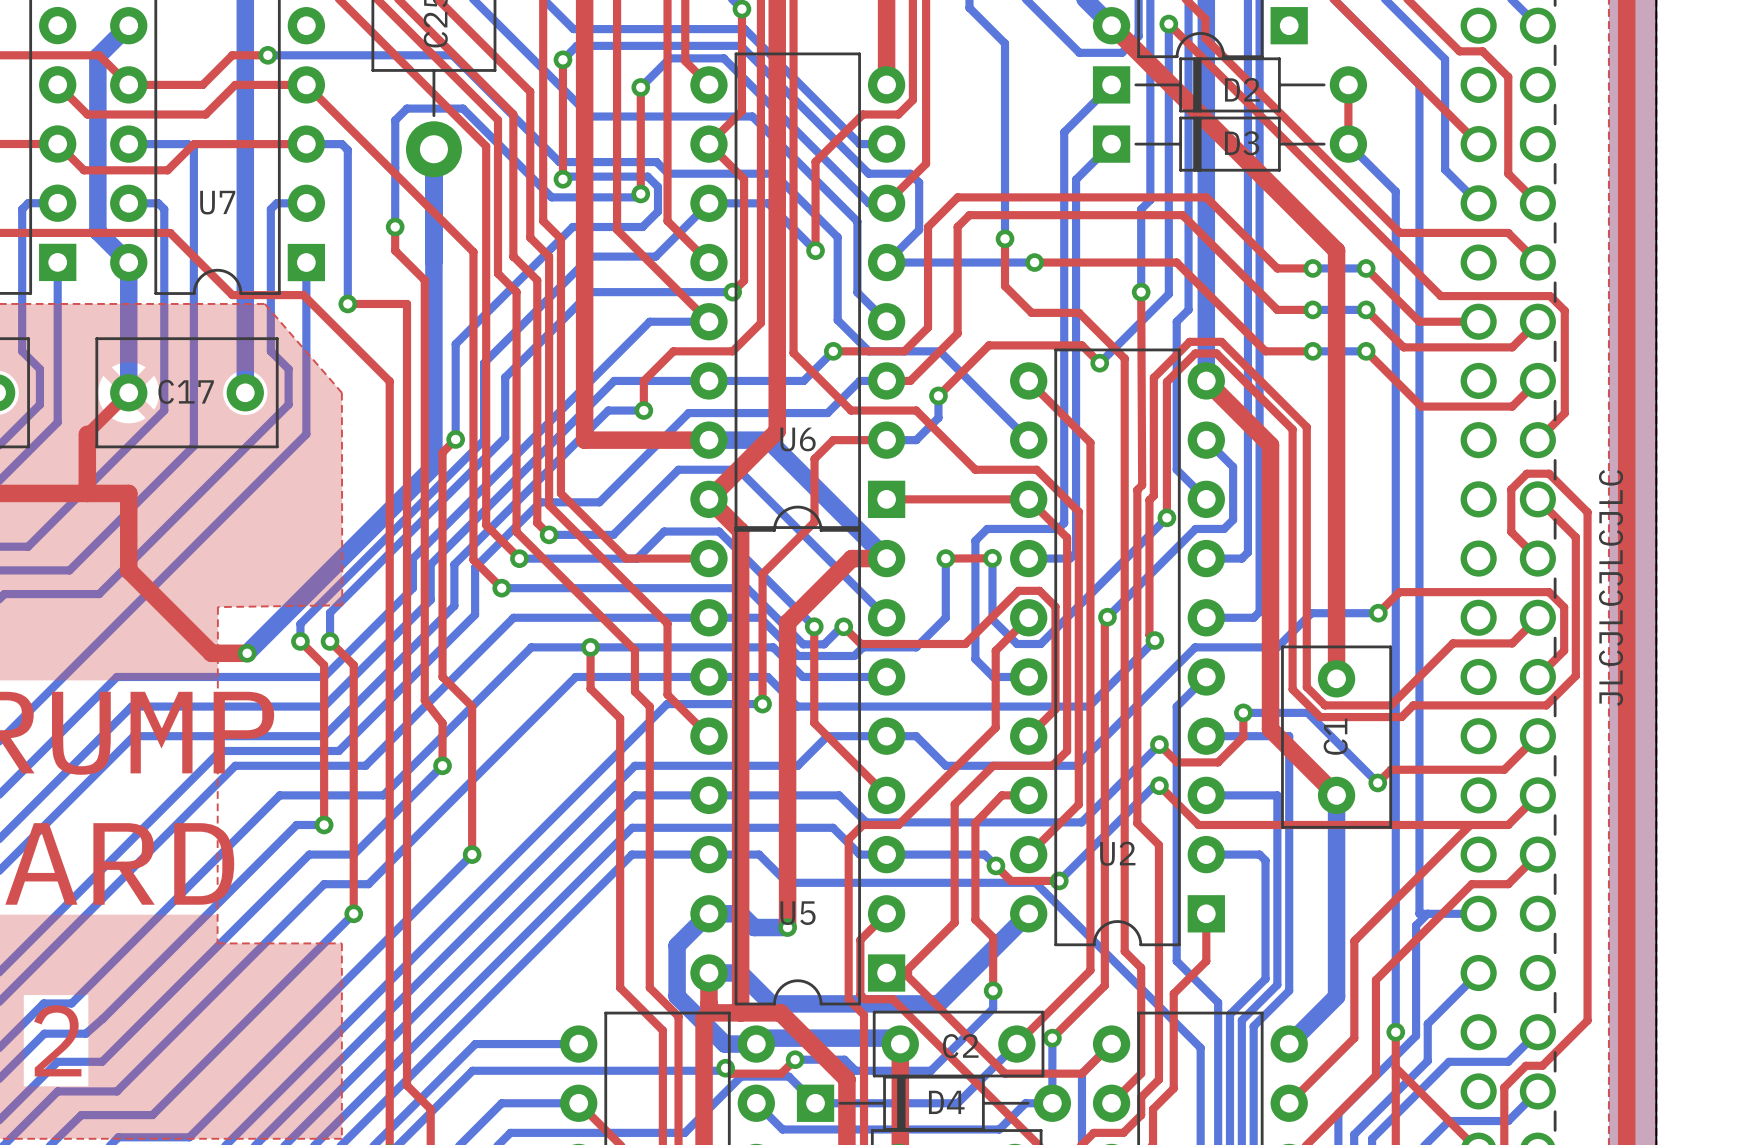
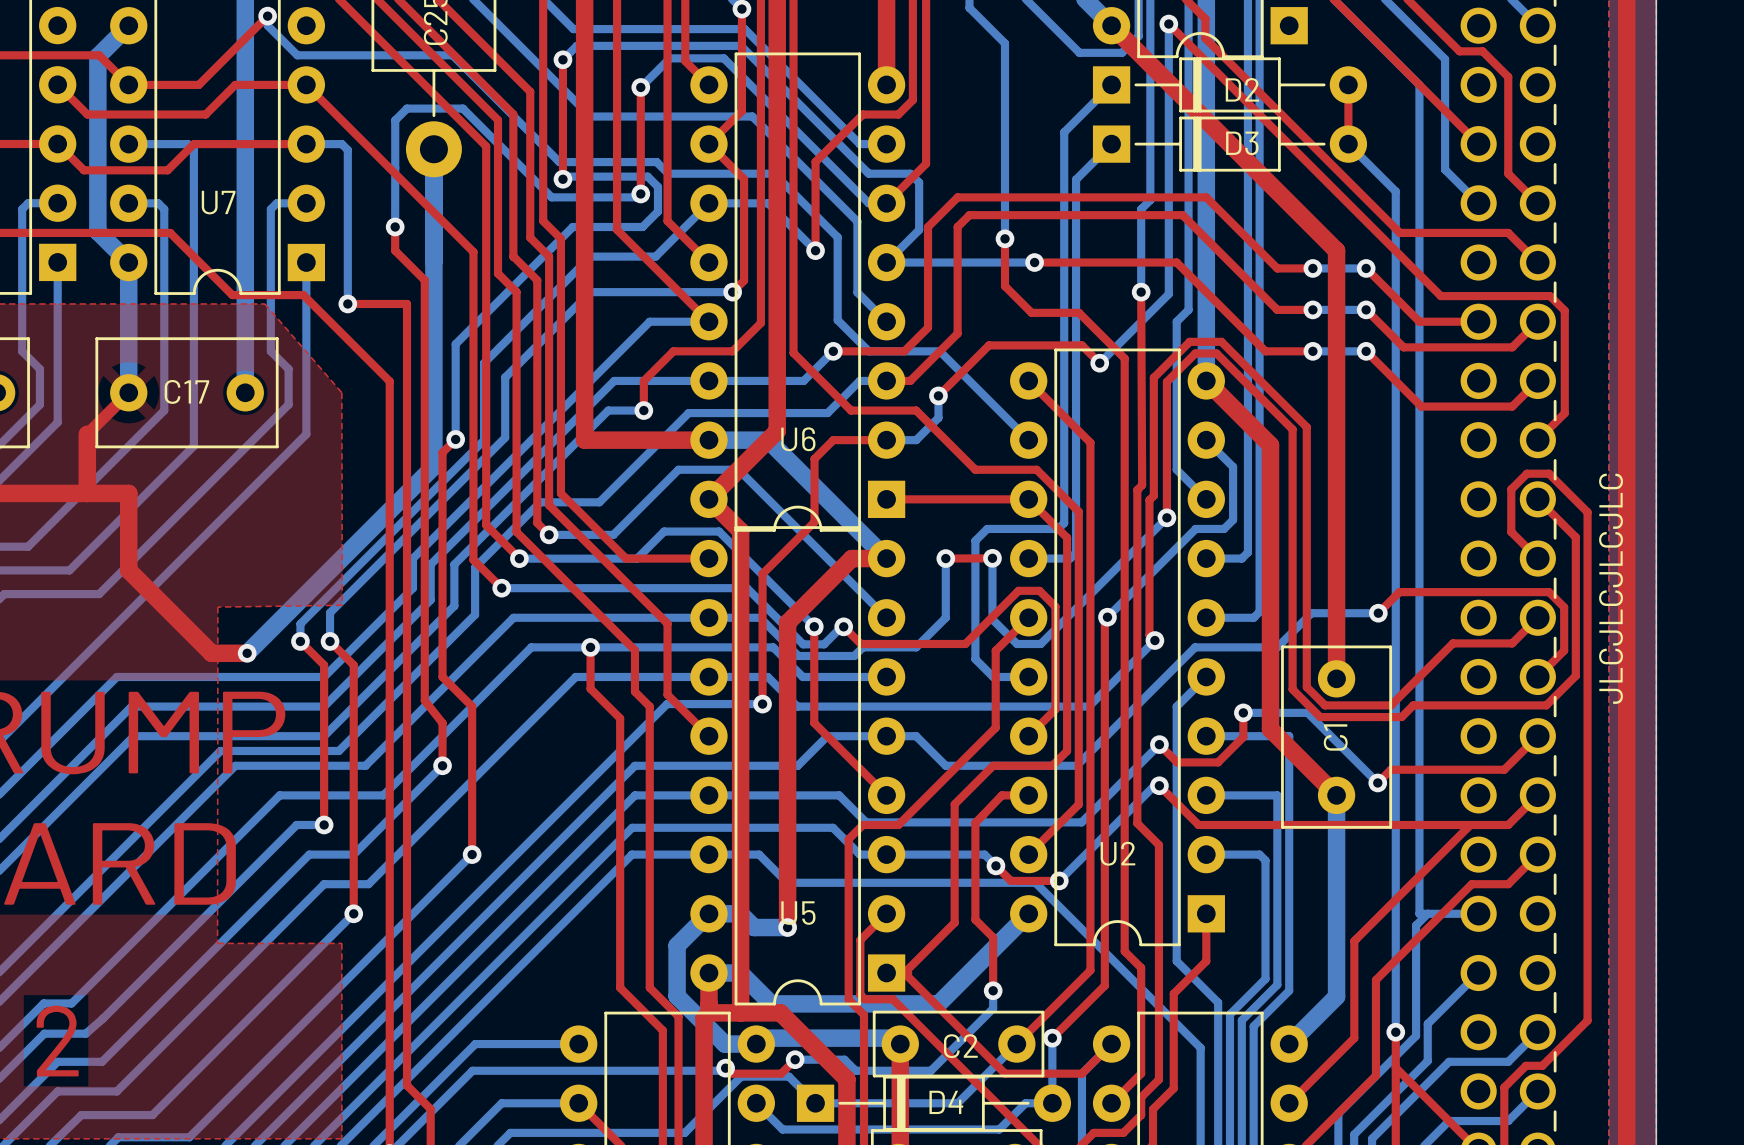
top track: (267, 55) (232, 55) (202, 84) (198, 84) -> (267, 16) (198, 84)
bottom track: (267, 55) (297, 55) -> (267, 16) (267, 25) (297, 55)
via position: (267, 55) -> (267, 16)

